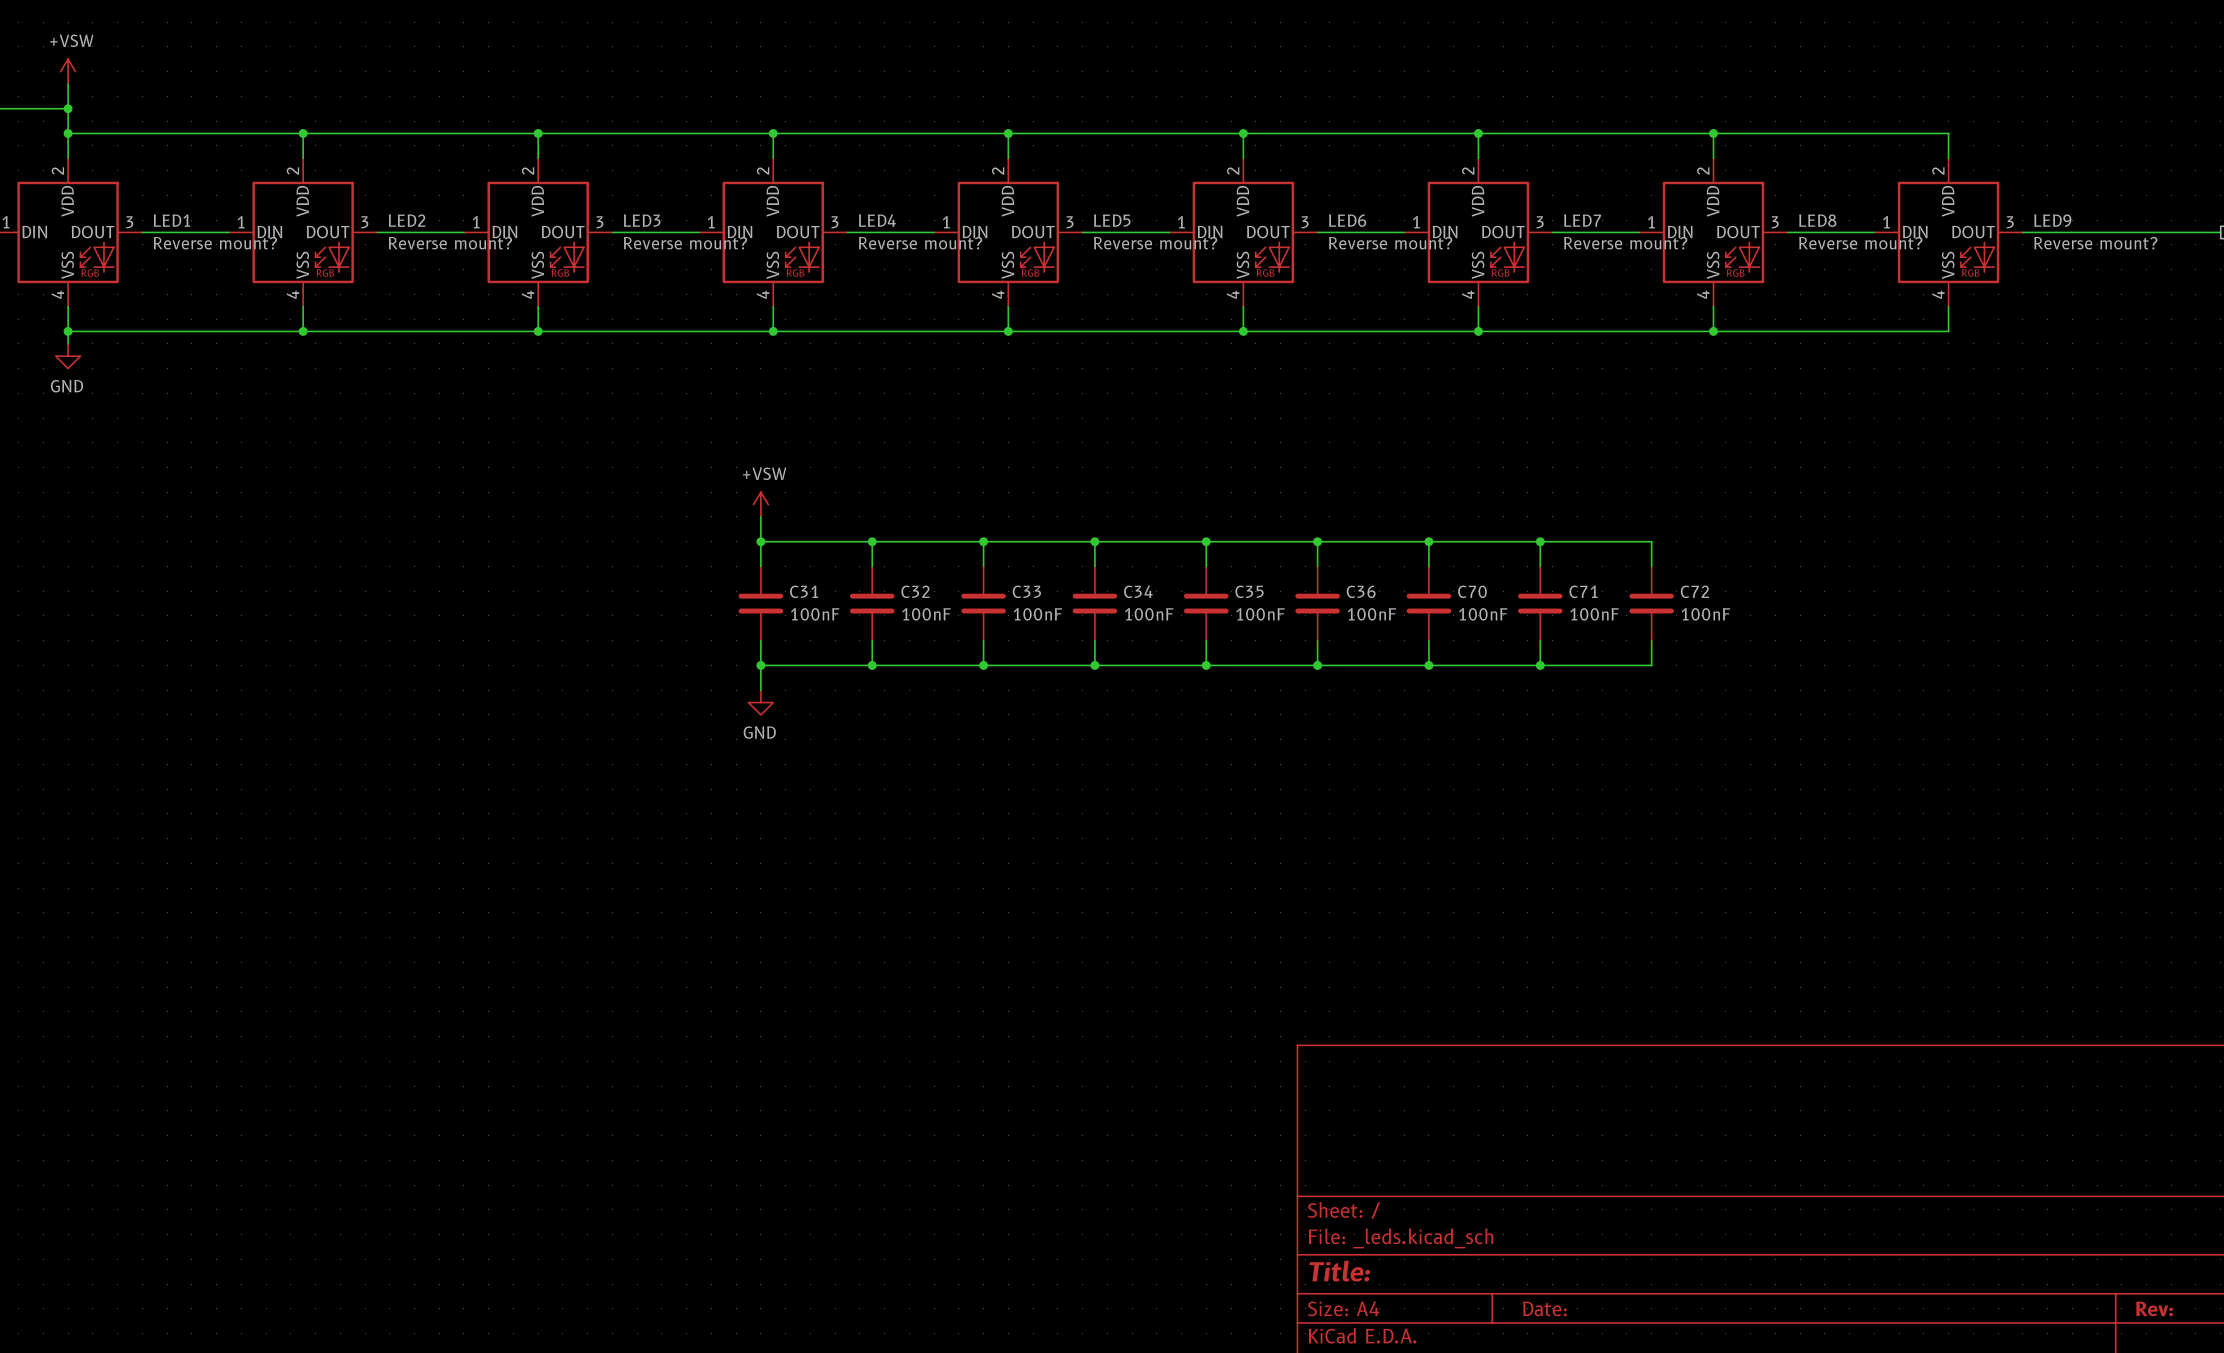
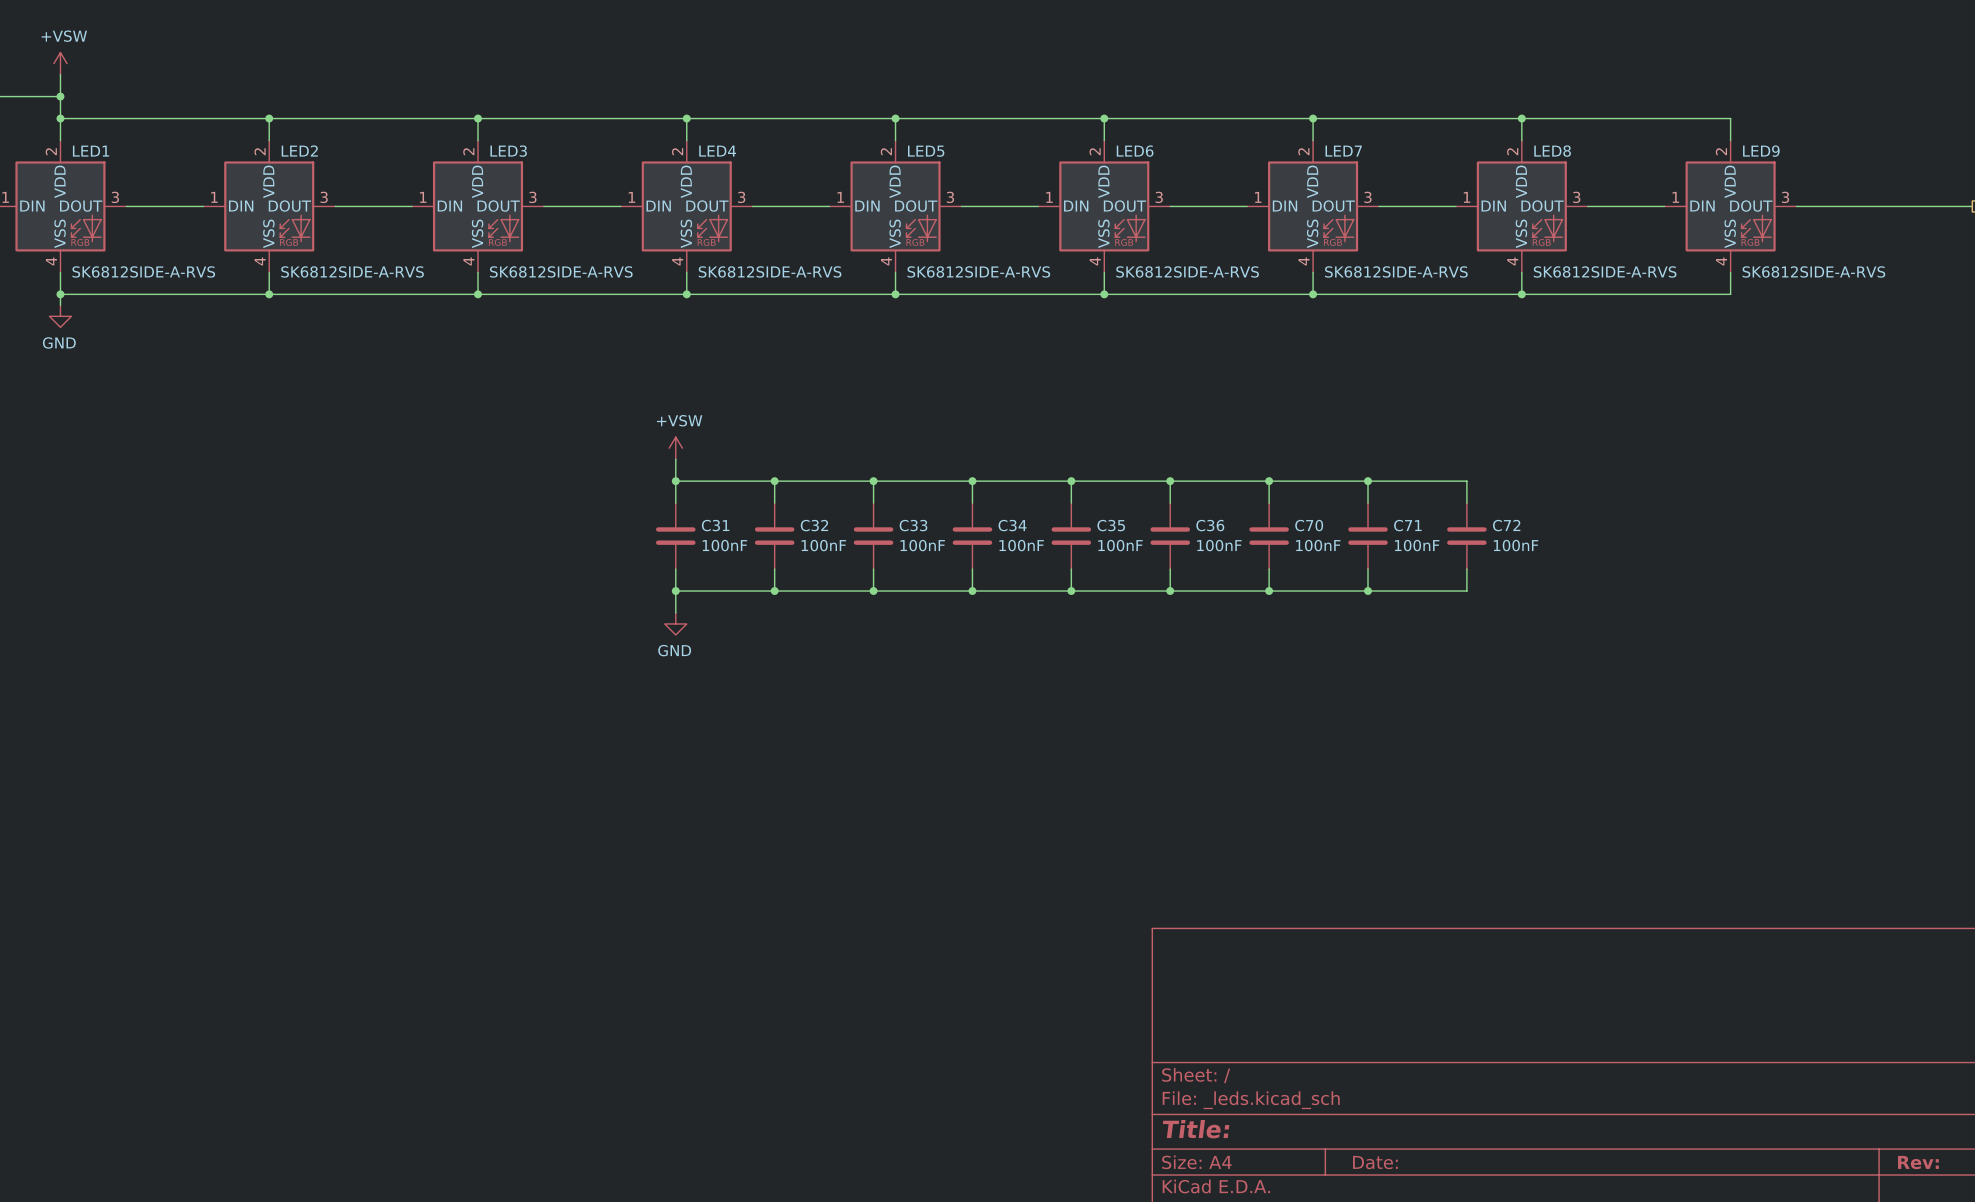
LED1 name position: LED1 (172, 220) -> LED1 (91, 151)
LED2 name position: LED2 (407, 220) -> LED2 (299, 151)
LED3 name position: LED3 (642, 220) -> LED3 (508, 151)
LED4 name position: LED4 (877, 220) -> LED4 (717, 151)
LED5 name position: LED5 (1112, 220) -> LED5 (926, 151)
LED6 name position: LED6 (1347, 220) -> LED6 (1135, 151)
LED7 name position: LED7 (1582, 220) -> LED7 (1343, 151)
LED8 name position: LED8 (1817, 220) -> LED8 (1552, 151)
LED9 name position: LED9 (2052, 220) -> LED9 (1761, 151)
LED1 value: Reverse mount? (215, 243) -> SK6812SIDE-A-RVS (143, 271)
LED2 value: Reverse mount? (450, 243) -> SK6812SIDE-A-RVS (352, 271)
LED3 value: Reverse mount? (685, 243) -> SK6812SIDE-A-RVS (561, 271)
LED4 value: Reverse mount? (920, 243) -> SK6812SIDE-A-RVS (770, 271)
LED5 value: Reverse mount? (1155, 243) -> SK6812SIDE-A-RVS (978, 271)
LED6 value: Reverse mount? (1390, 243) -> SK6812SIDE-A-RVS (1187, 271)
LED7 value: Reverse mount? (1625, 243) -> SK6812SIDE-A-RVS (1396, 271)
LED8 value: Reverse mount? (1860, 243) -> SK6812SIDE-A-RVS (1605, 271)
LED9 value: Reverse mount? (2095, 243) -> SK6812SIDE-A-RVS (1813, 271)

